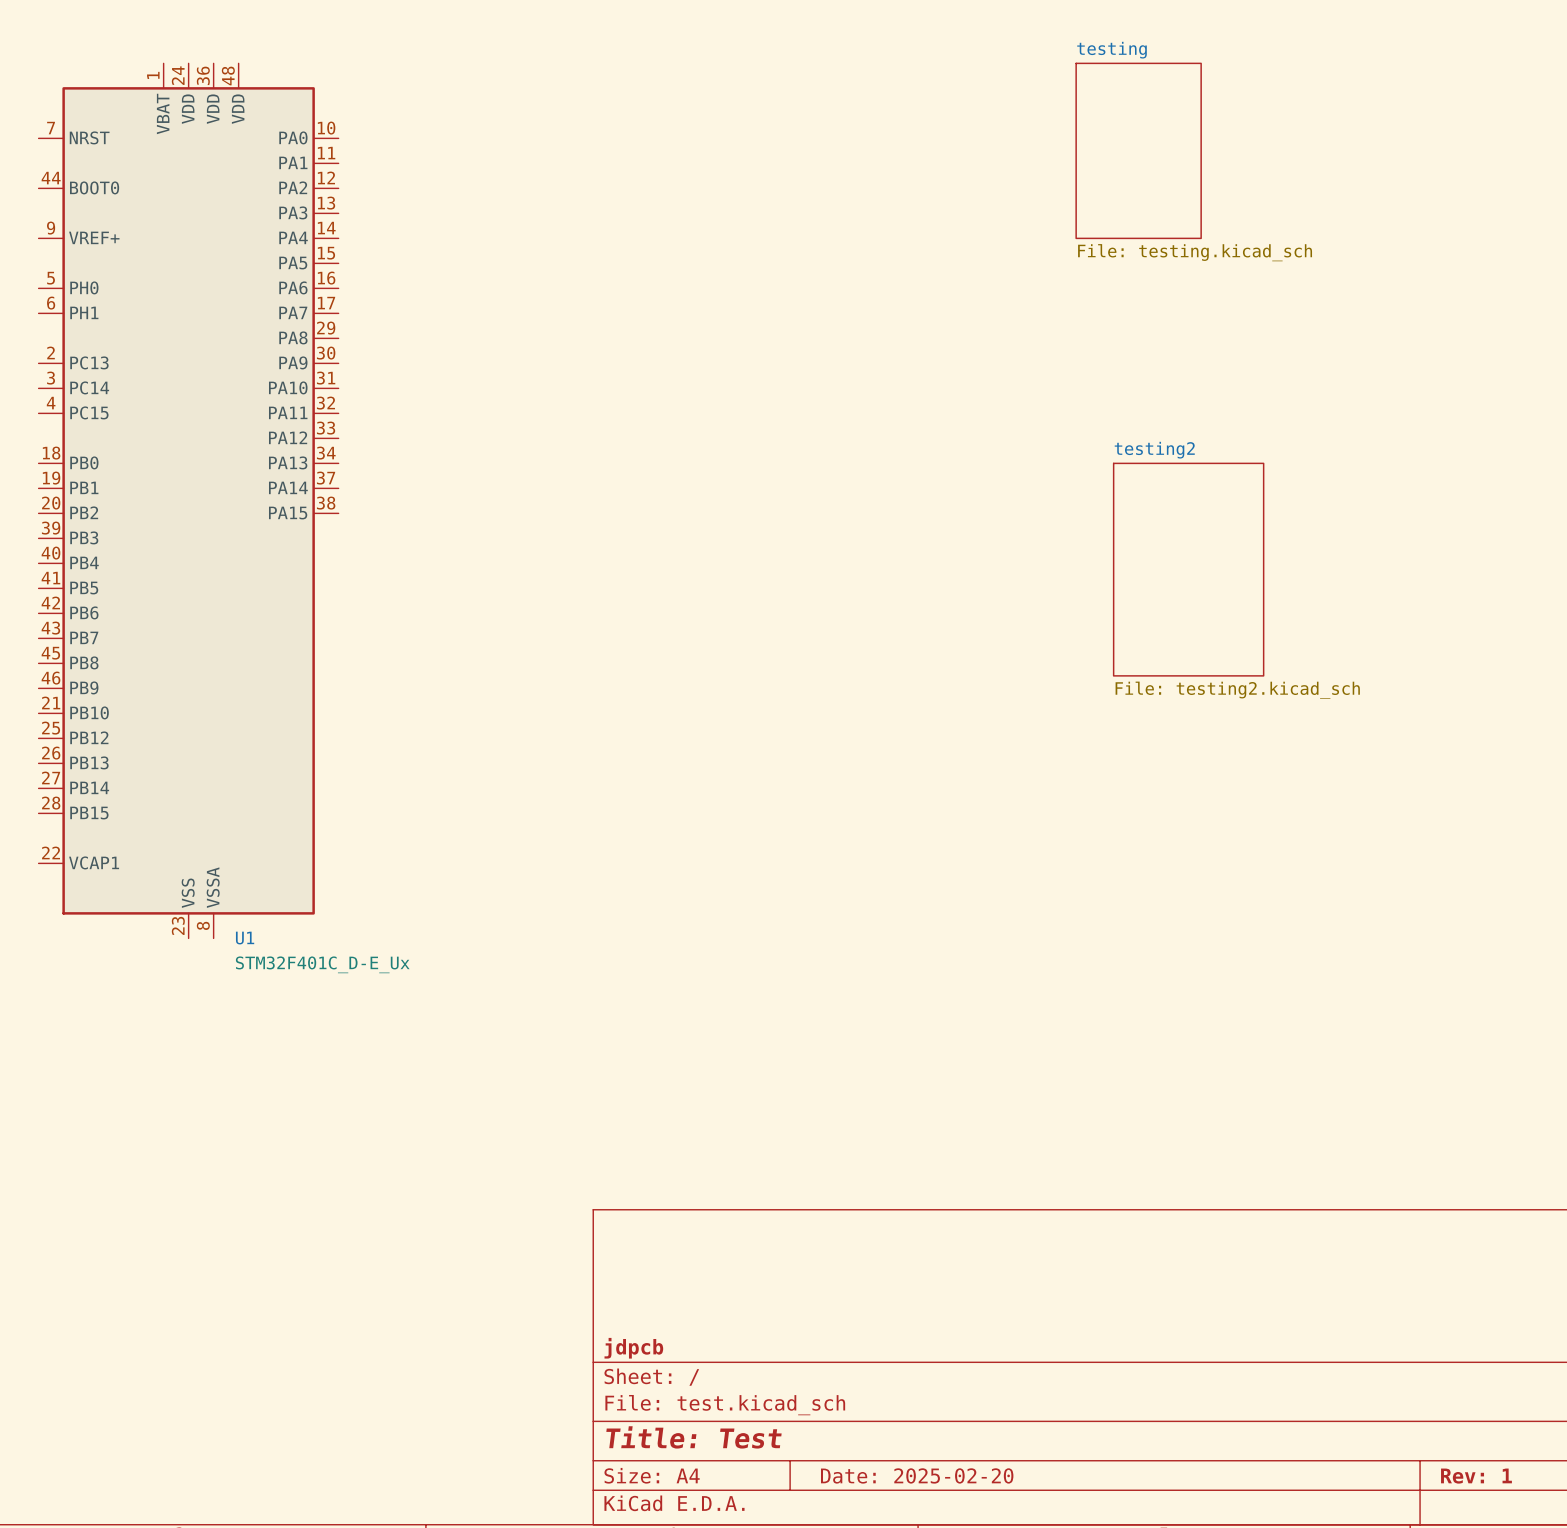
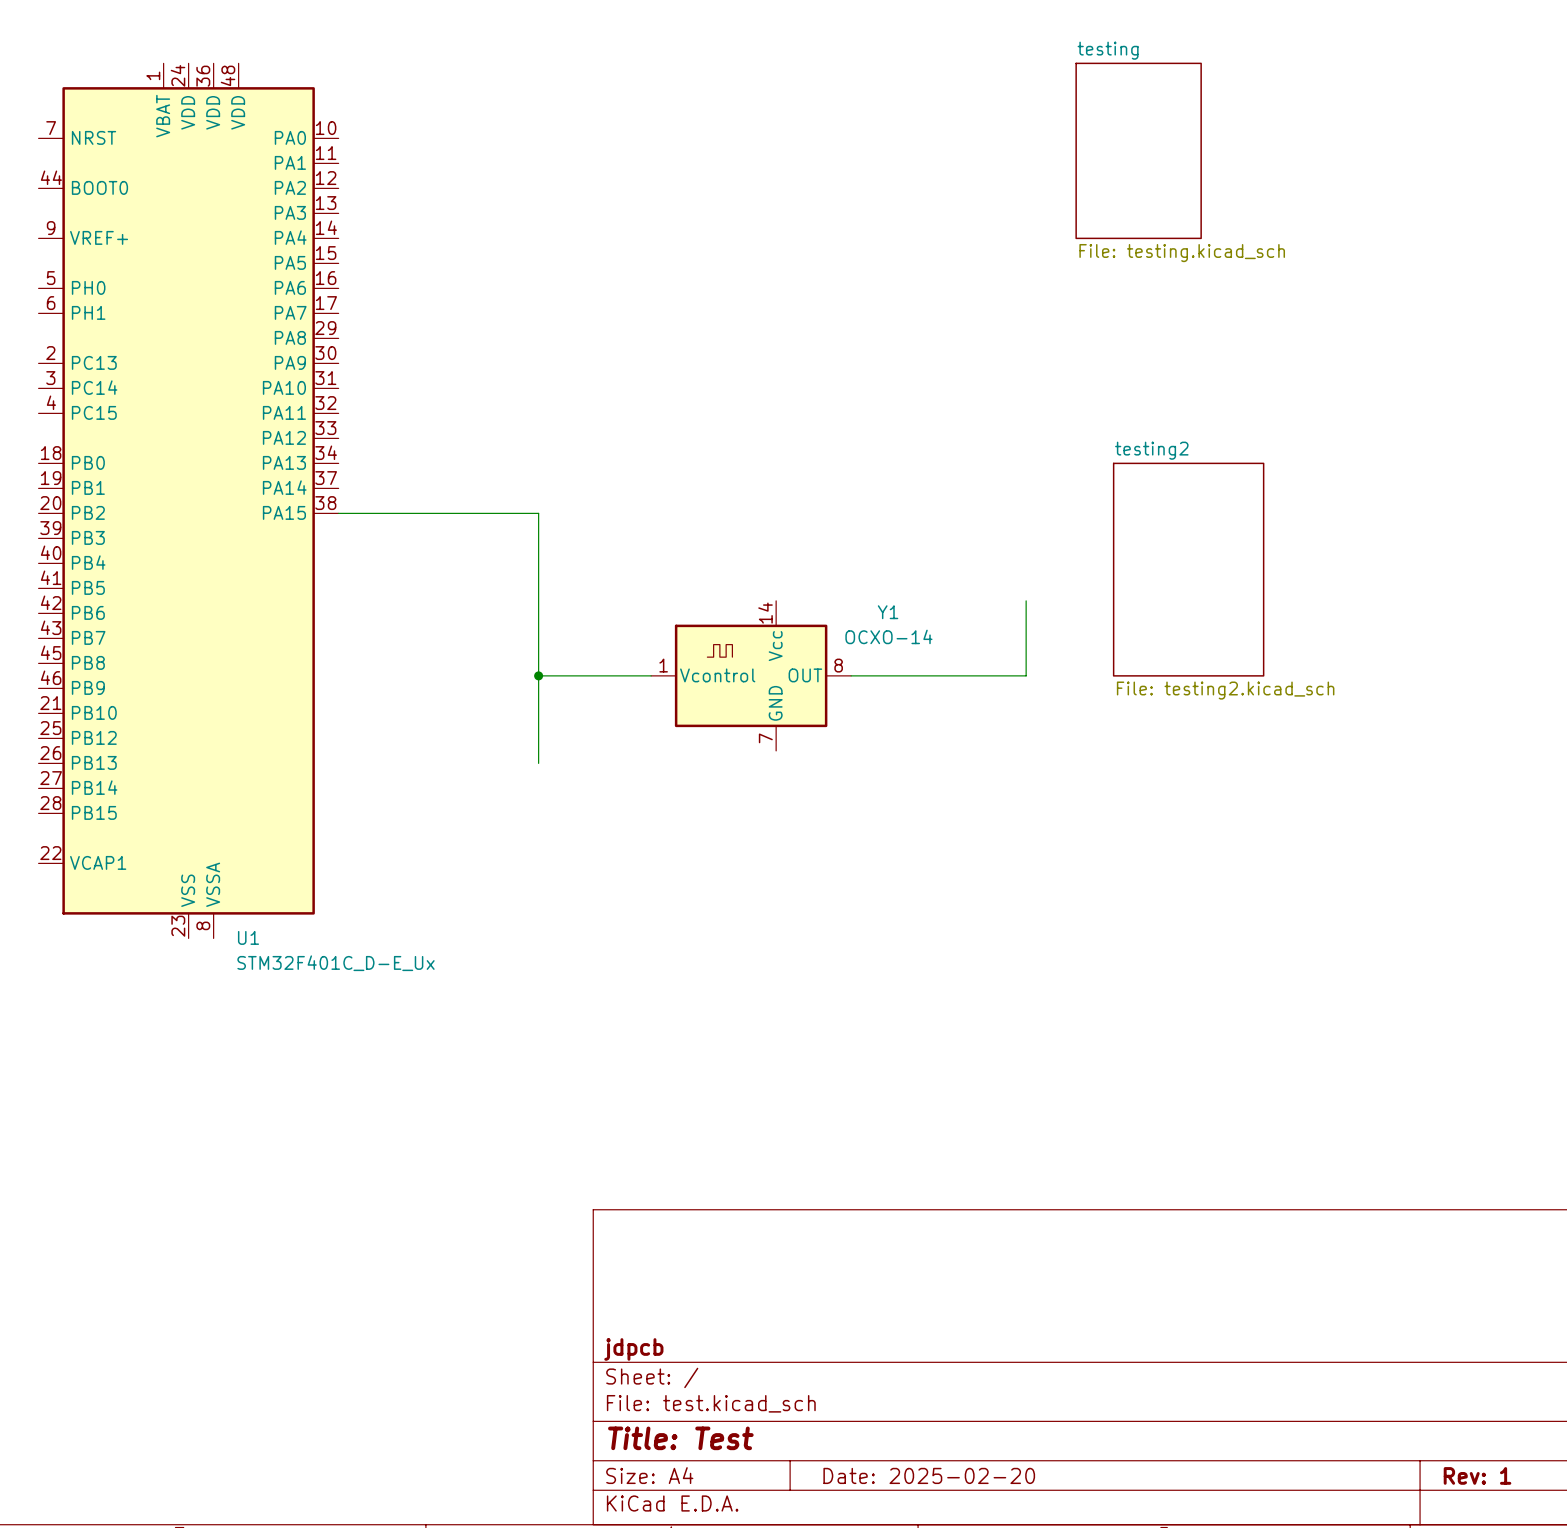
wire: none -> (338, 513) (538, 513) (538, 763)
wire: none -> (1026, 600) (1026, 675) (851, 675)
wire: none -> (538, 675) (651, 675)
junction: none -> (538, 675)
Y1: none -> OCXO-14 (751, 675)

